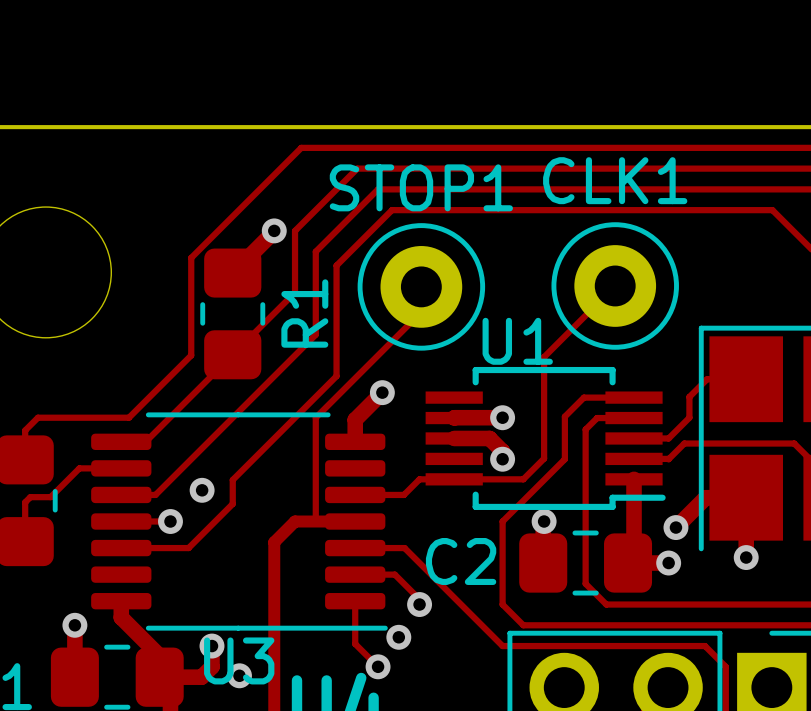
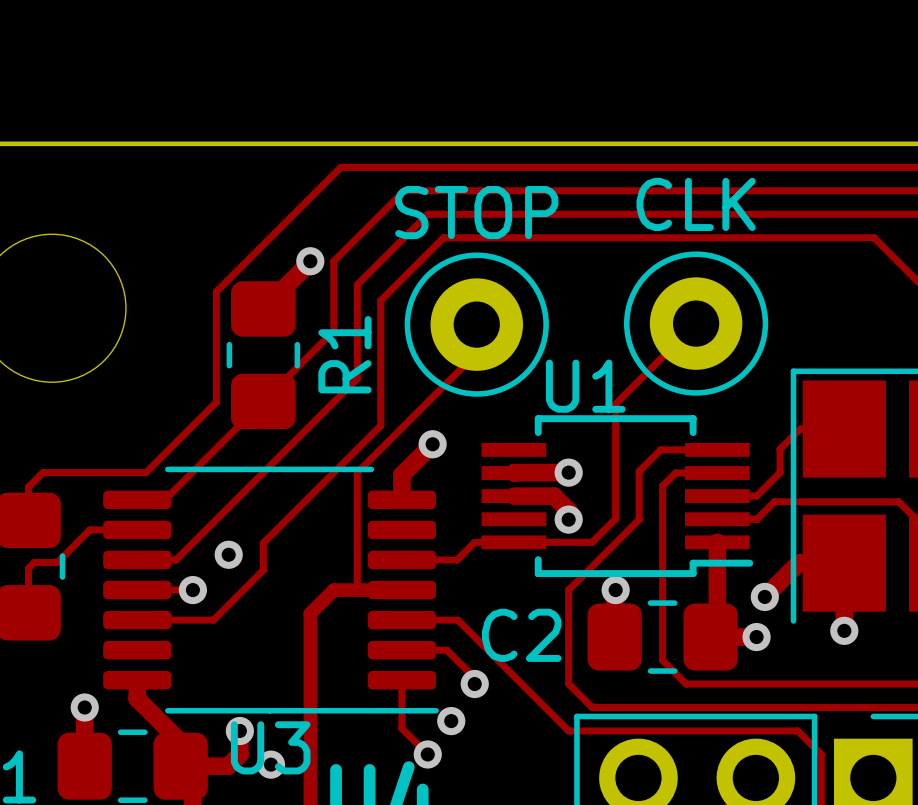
CLK1 name: CLK1 (615, 180) -> CLK (696, 204)
STOP1 name: STOP1 (421, 187) -> STOP (476, 212)

